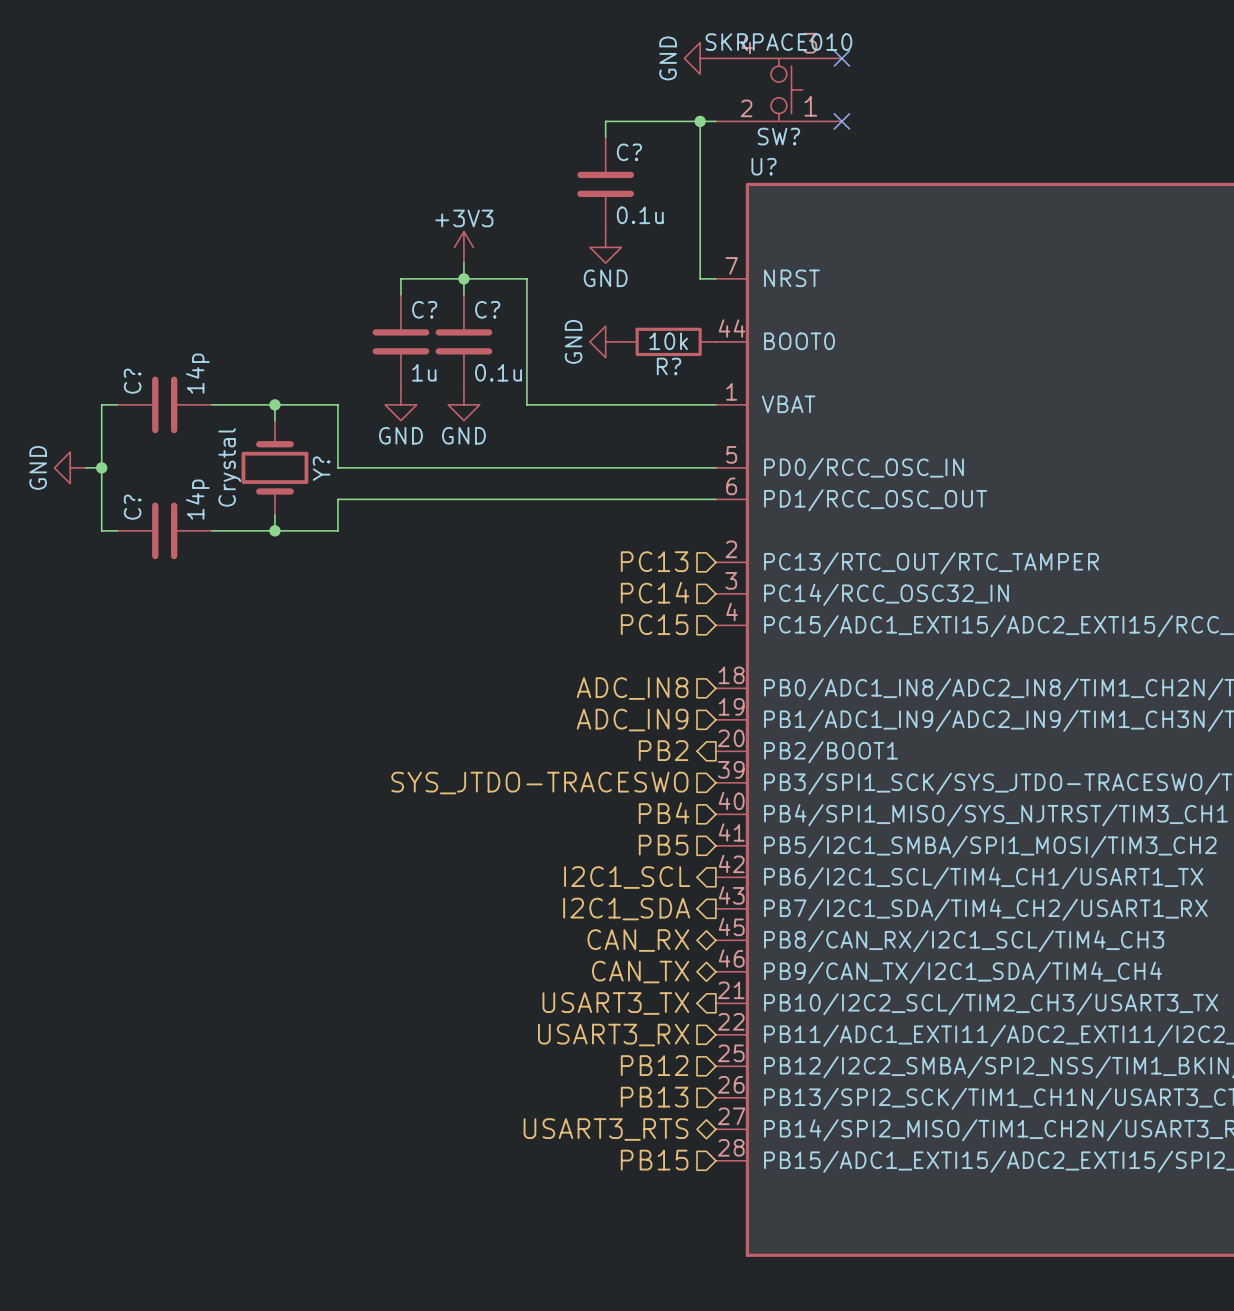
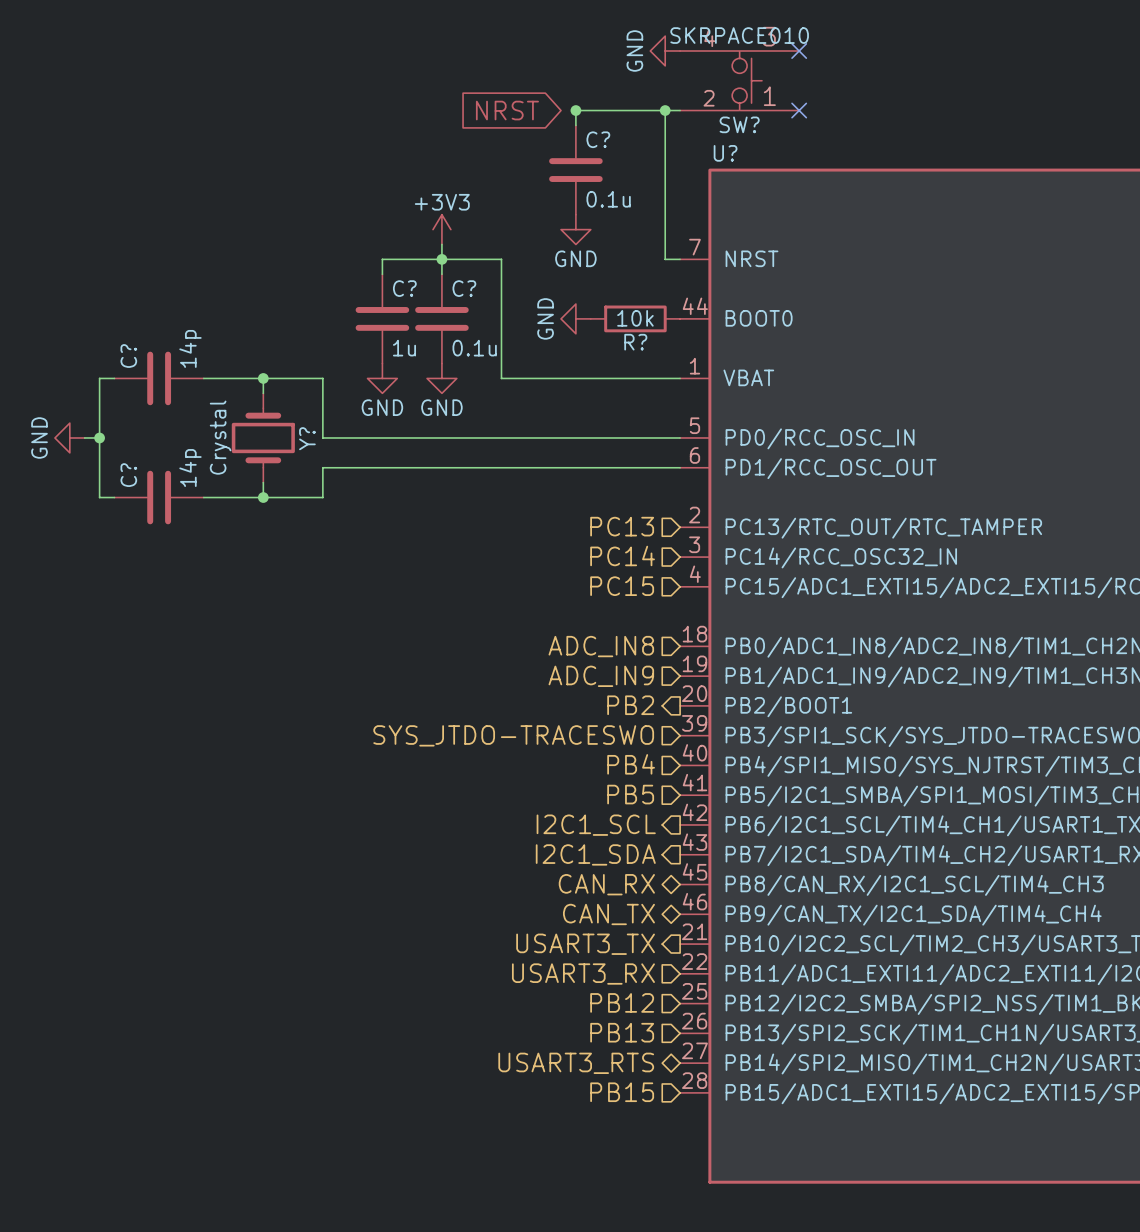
global label: none -> NRST (507, 110)
junction: none -> (575, 110)

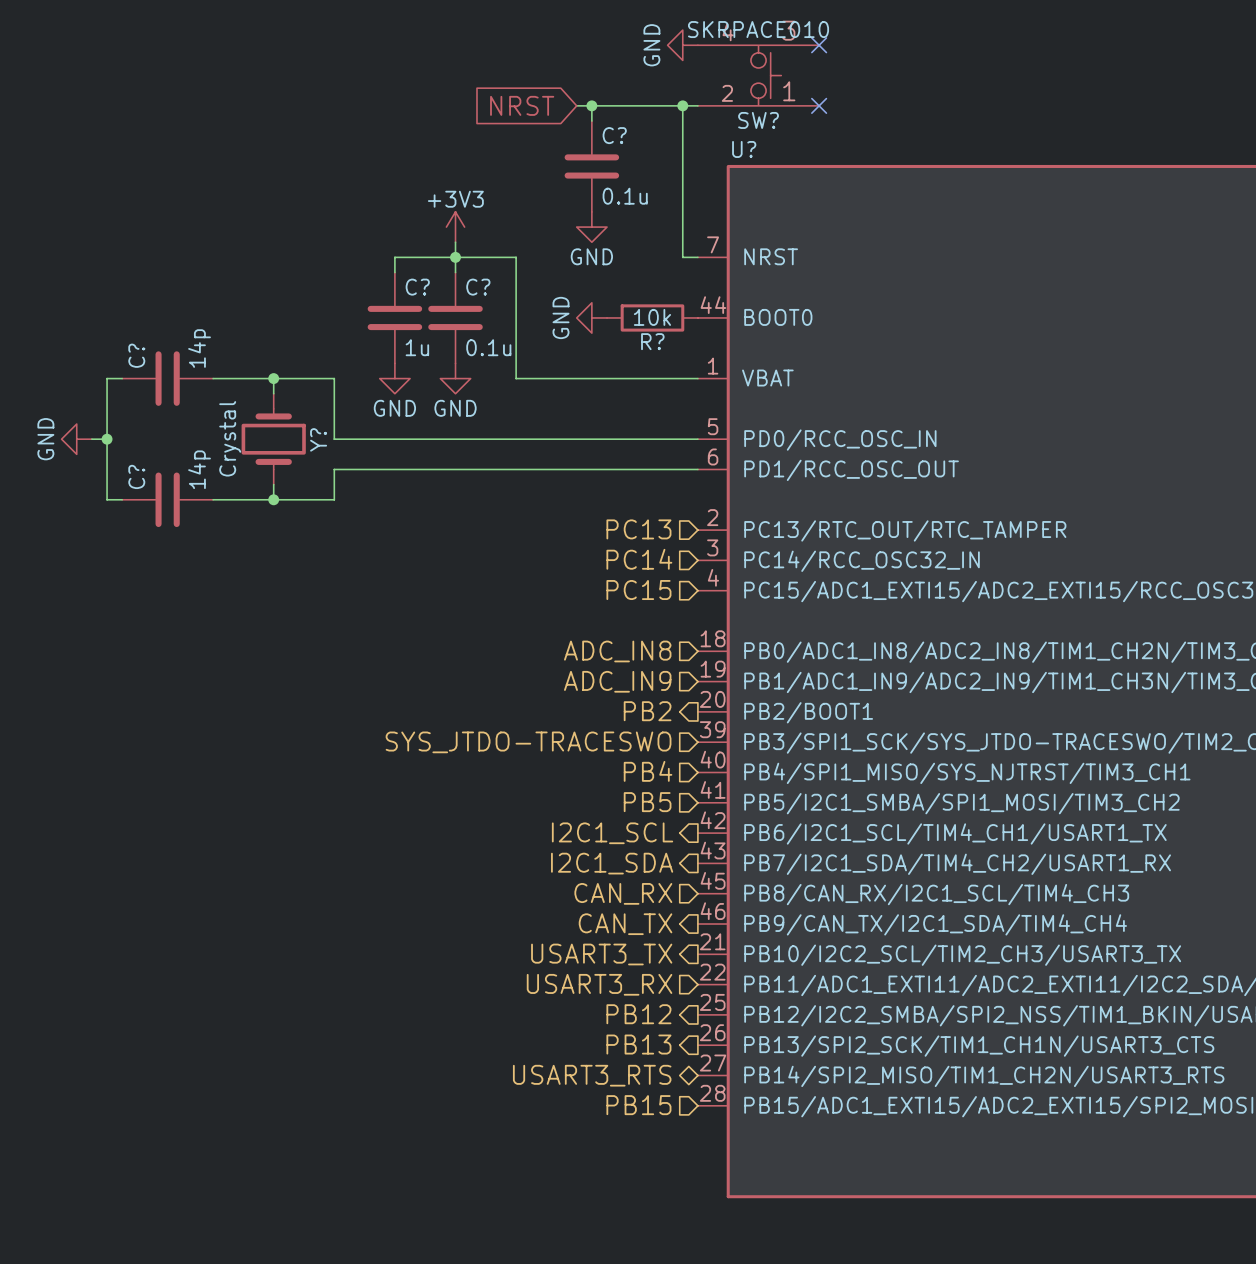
wire: none -> (576, 105) (591, 105)
hierarchical label shape: bidirectional (606, 884) -> input (623, 893)
hierarchical label shape: bidirectional (608, 914) -> output (625, 924)
hierarchical label shape: input (622, 1002) -> output (638, 1014)
hierarchical label shape: input (622, 1032) -> output (638, 1044)

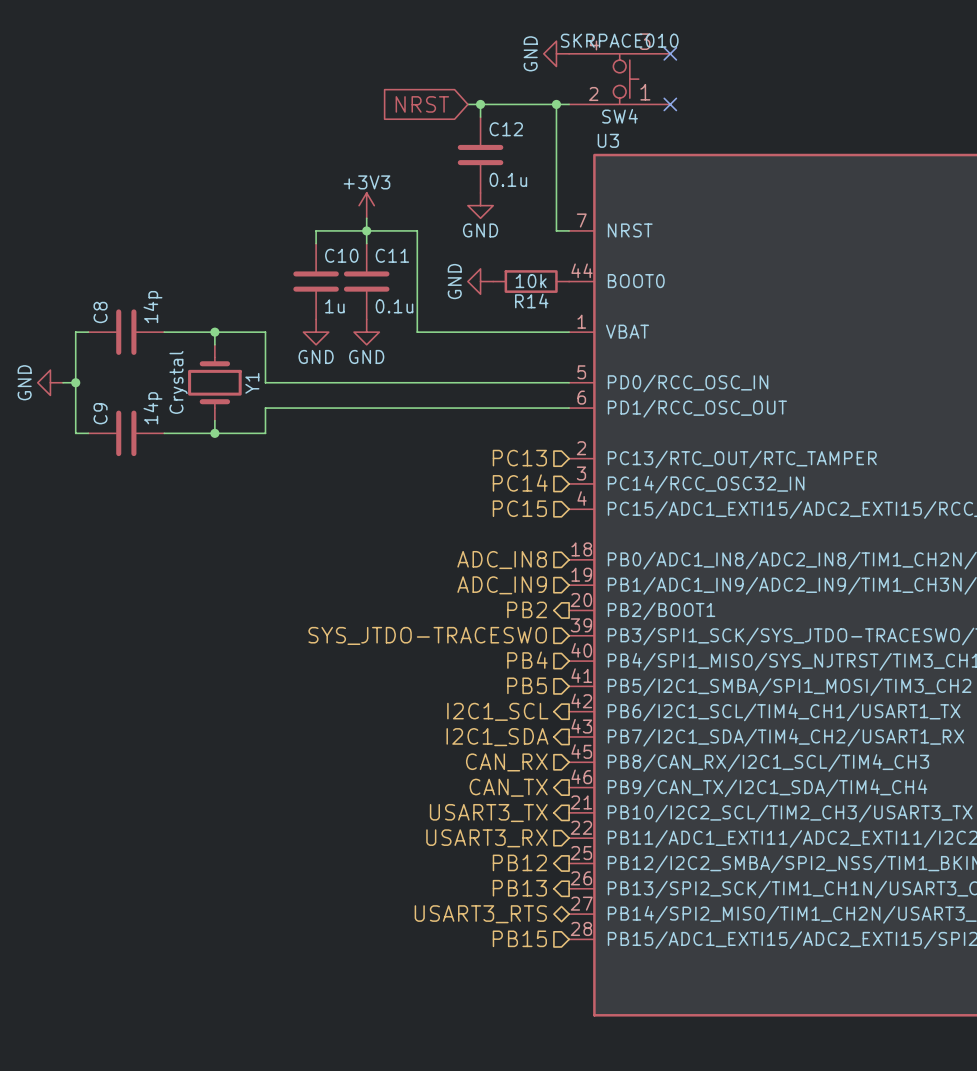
SW? name: SW? (758, 120) -> SW4 (620, 116)
C? name: C? (614, 135) -> C12 (506, 129)
U? name: U? (744, 149) -> U3 (608, 140)
C? name: C? (417, 287) -> C10 (341, 255)
C? name: C? (478, 287) -> C11 (392, 255)
R? name: R? (652, 341) -> R14 (531, 301)
C? name: C? (136, 355) -> C8 (100, 312)
Y? name: Y? (318, 439) -> Y1 (252, 383)
C? name: C? (136, 476) -> C9 (100, 413)

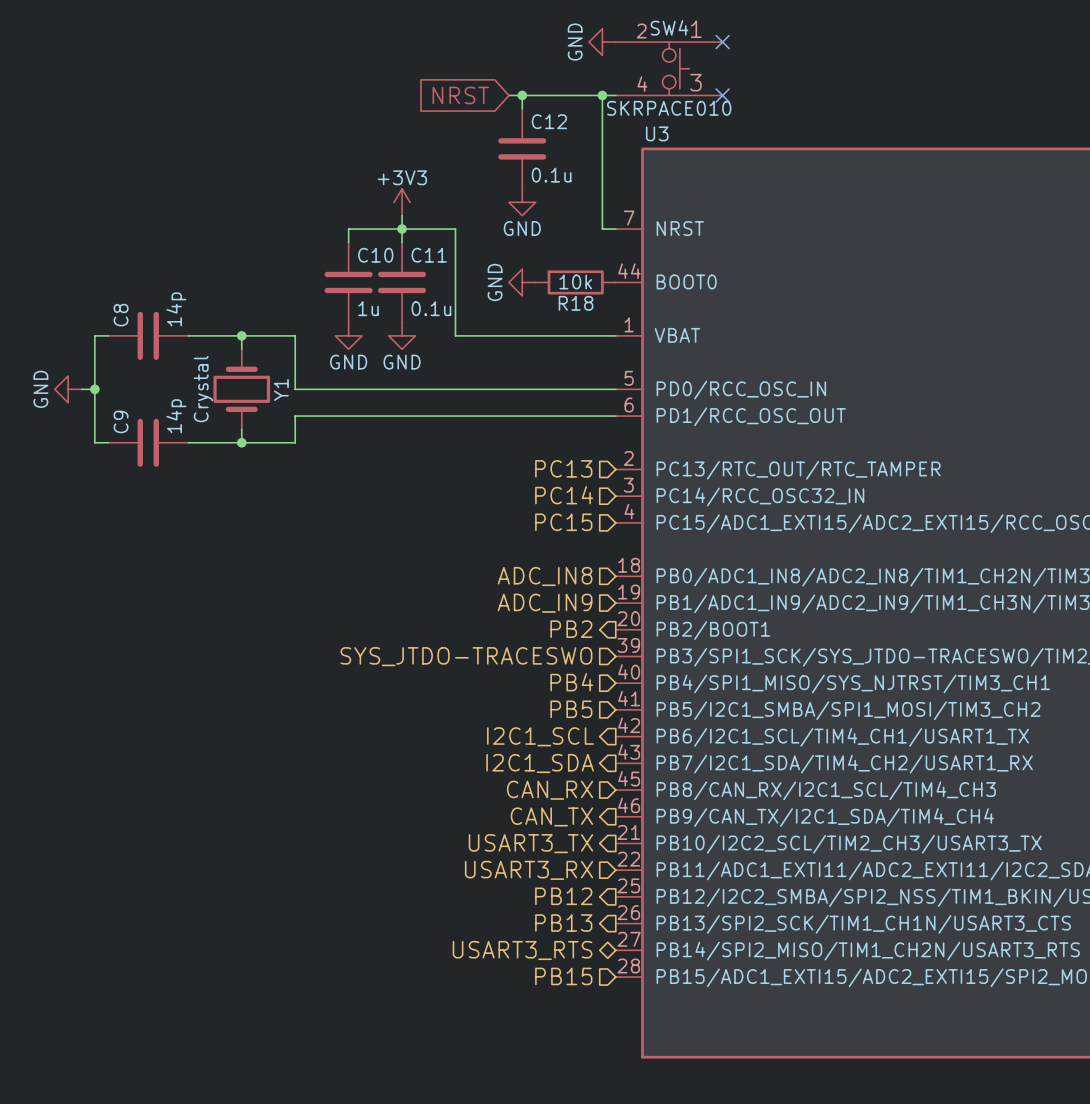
SW4 flip: as is (626, 79) -> up-down (675, 68)
R14 name: R14 (531, 301) -> R18 (576, 303)

